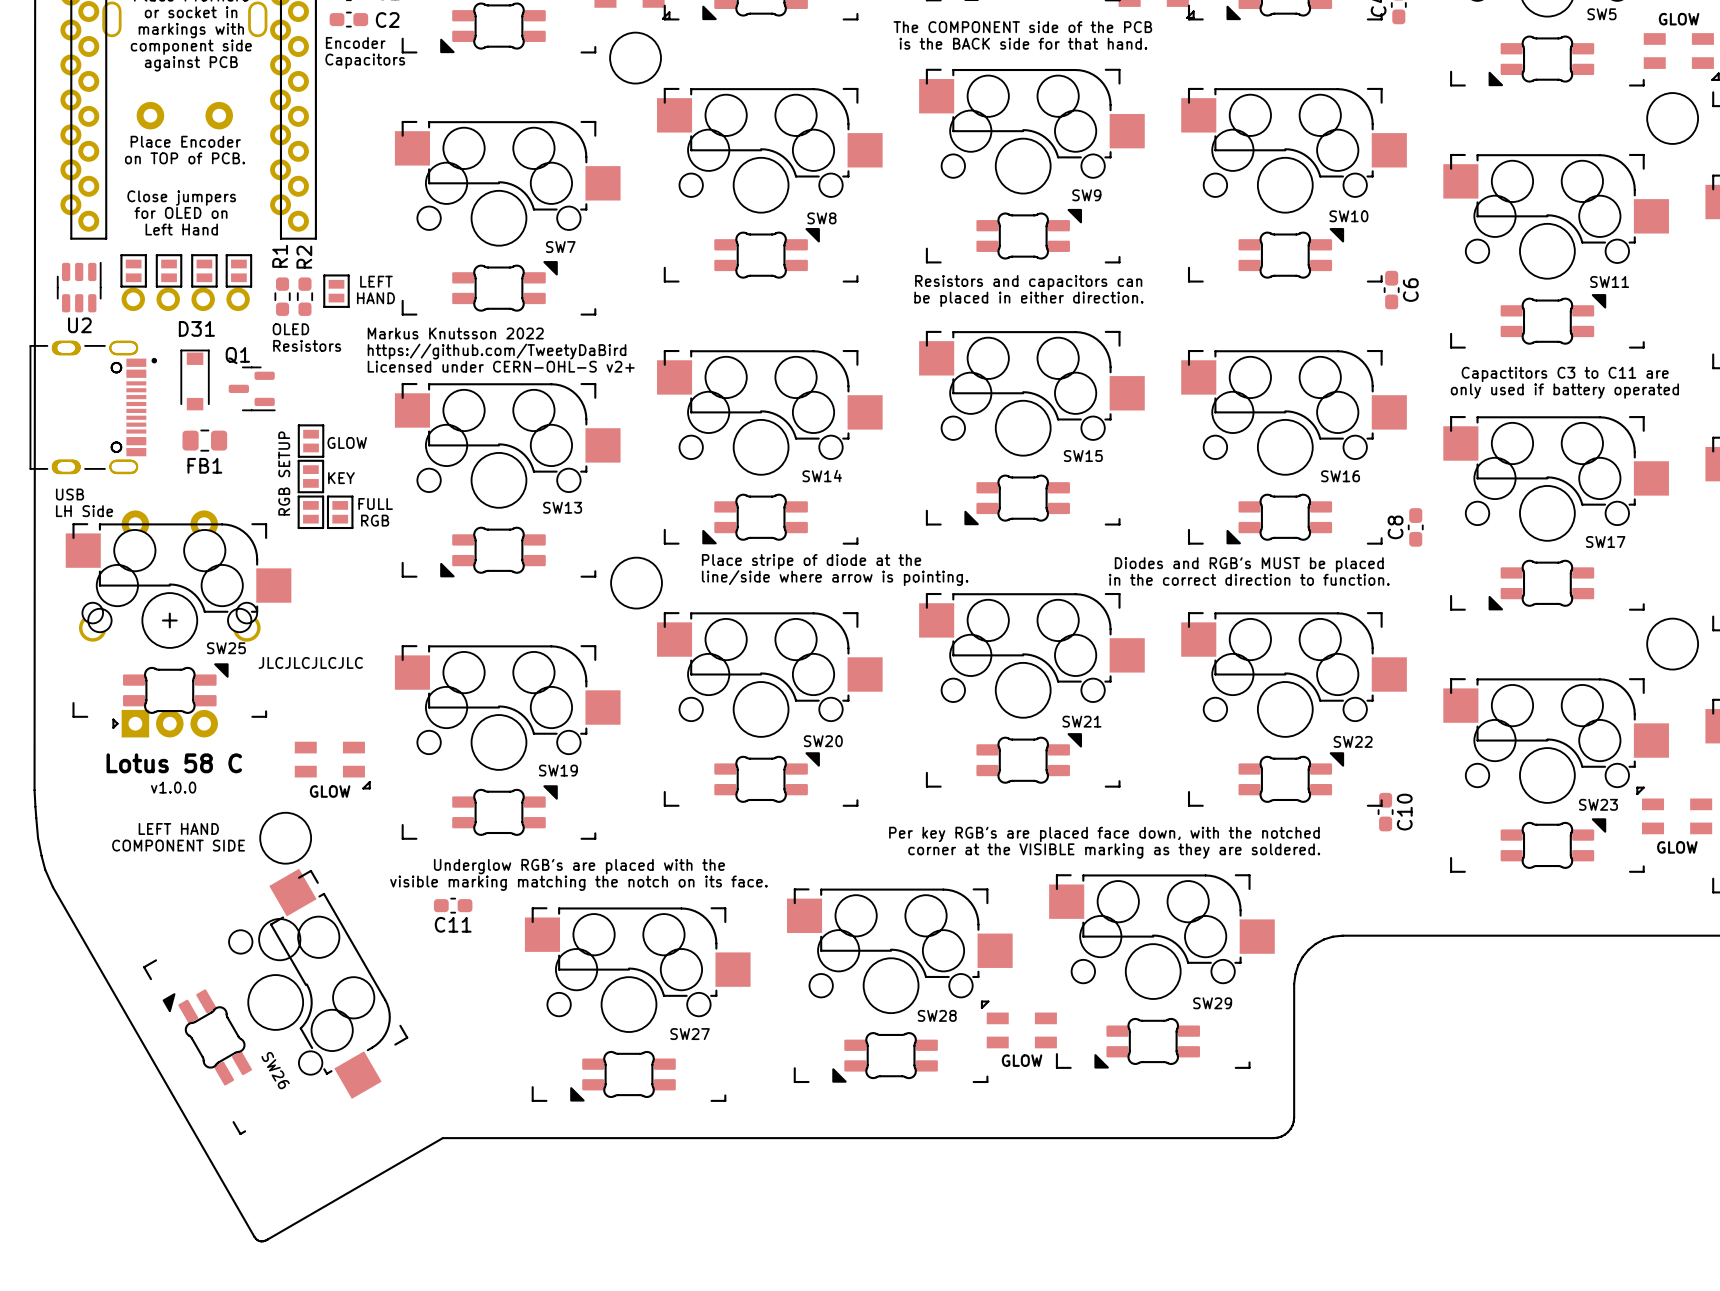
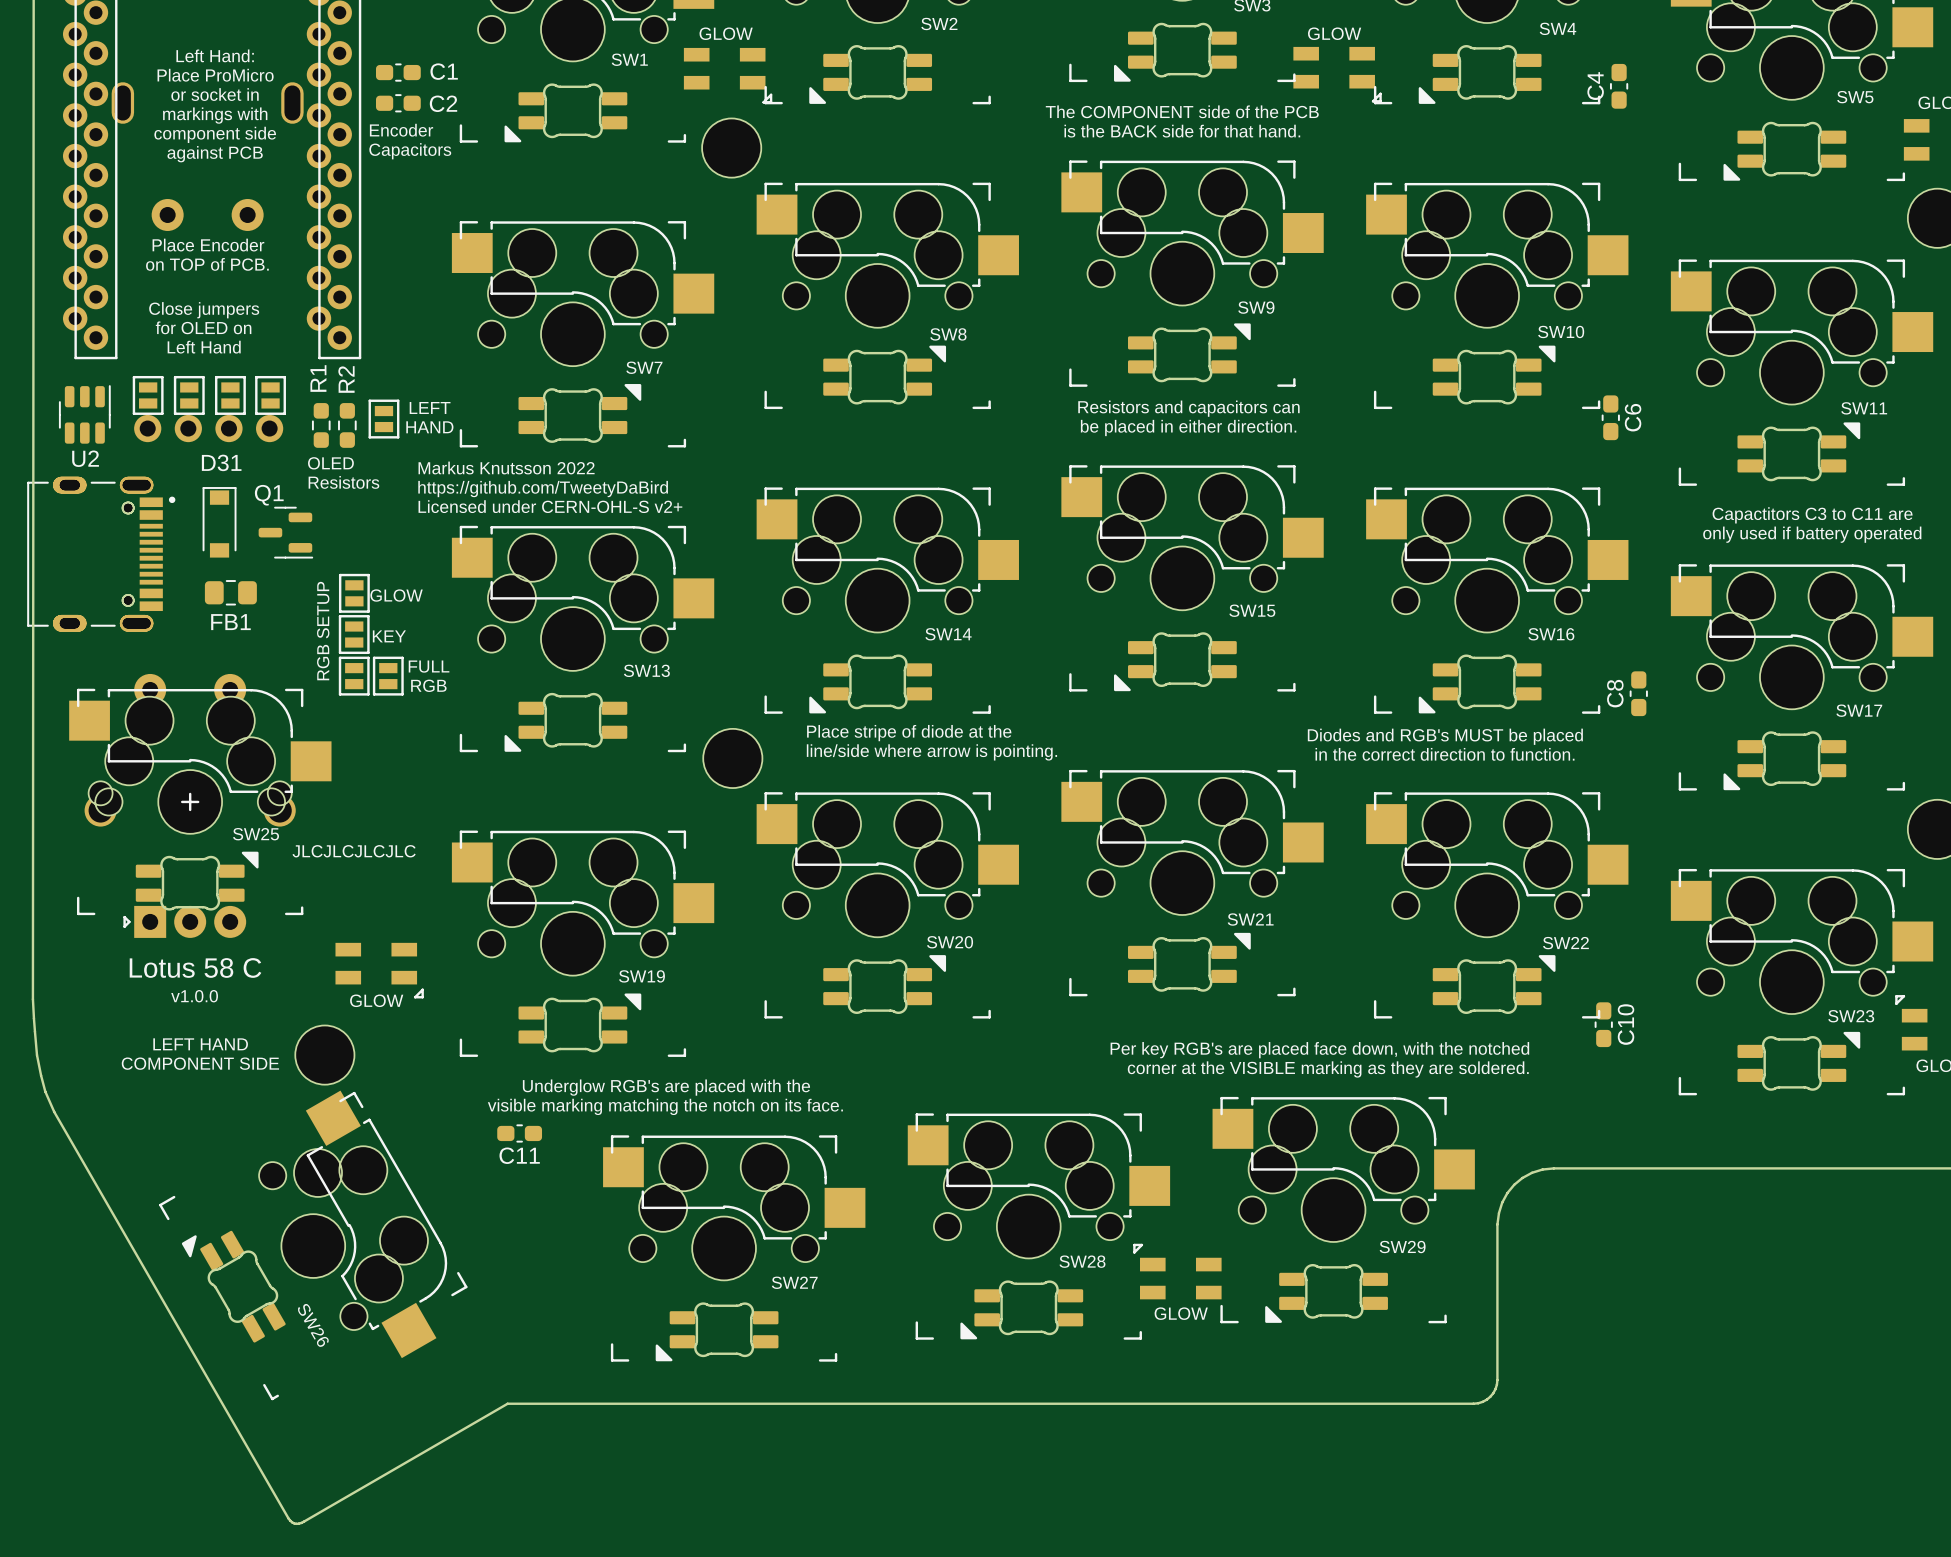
text: USB (70, 494) -> none
text: LH Side (84, 511) -> none

